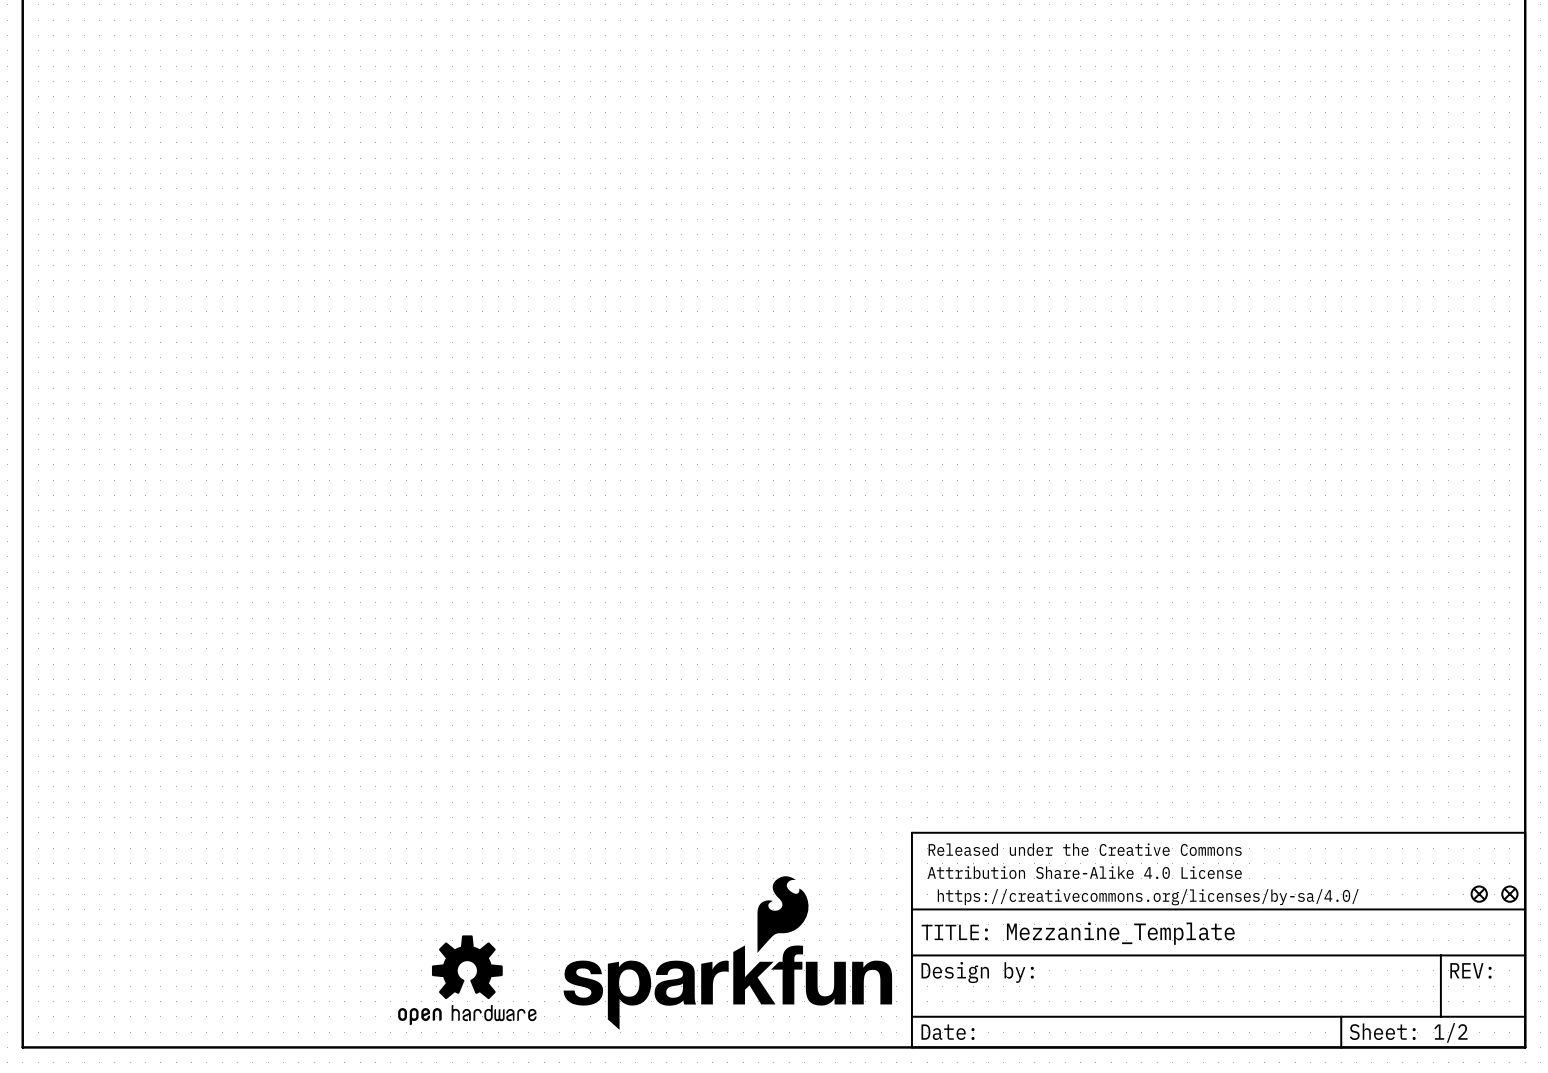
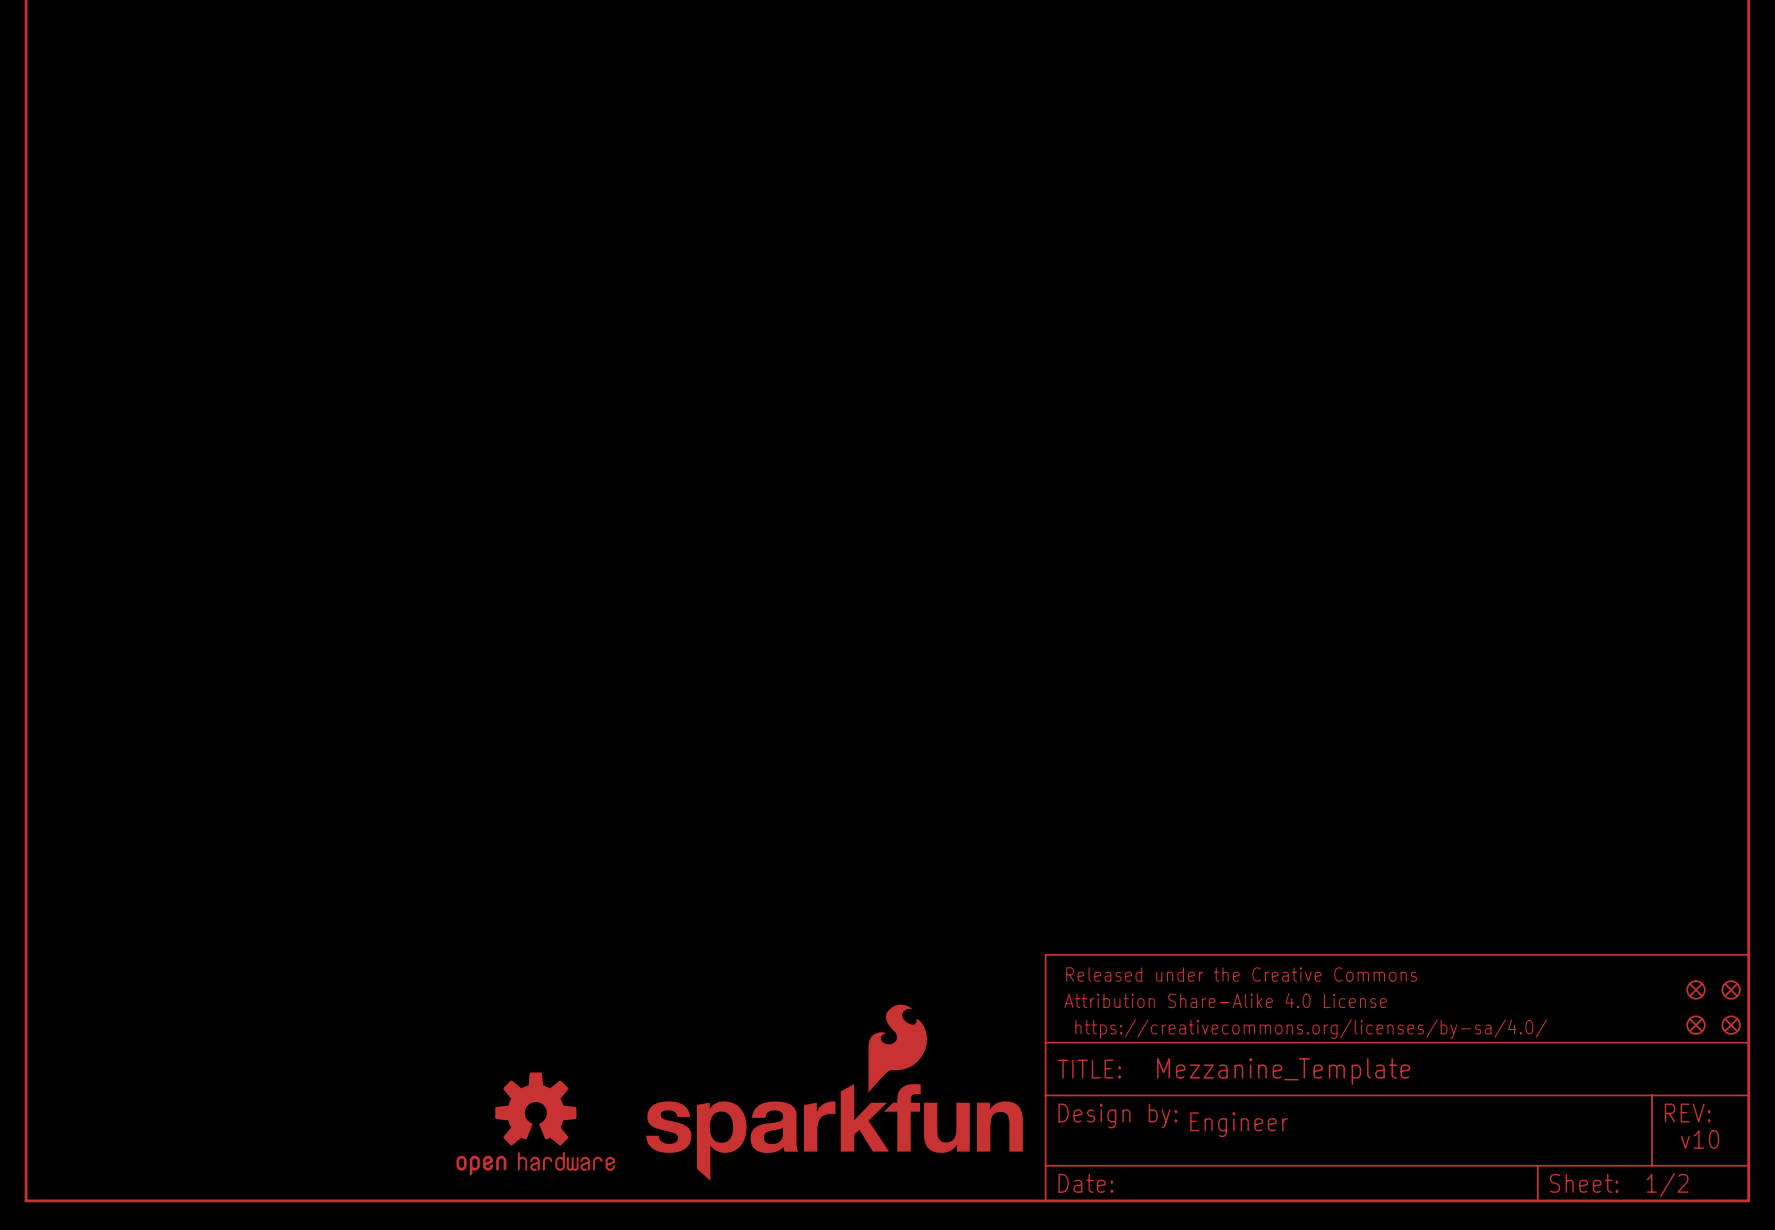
part: none -> (1695, 989)
part: none -> (1731, 989)
text: none -> Engineer (1239, 1124)
text: none -> v10 (1700, 1139)

